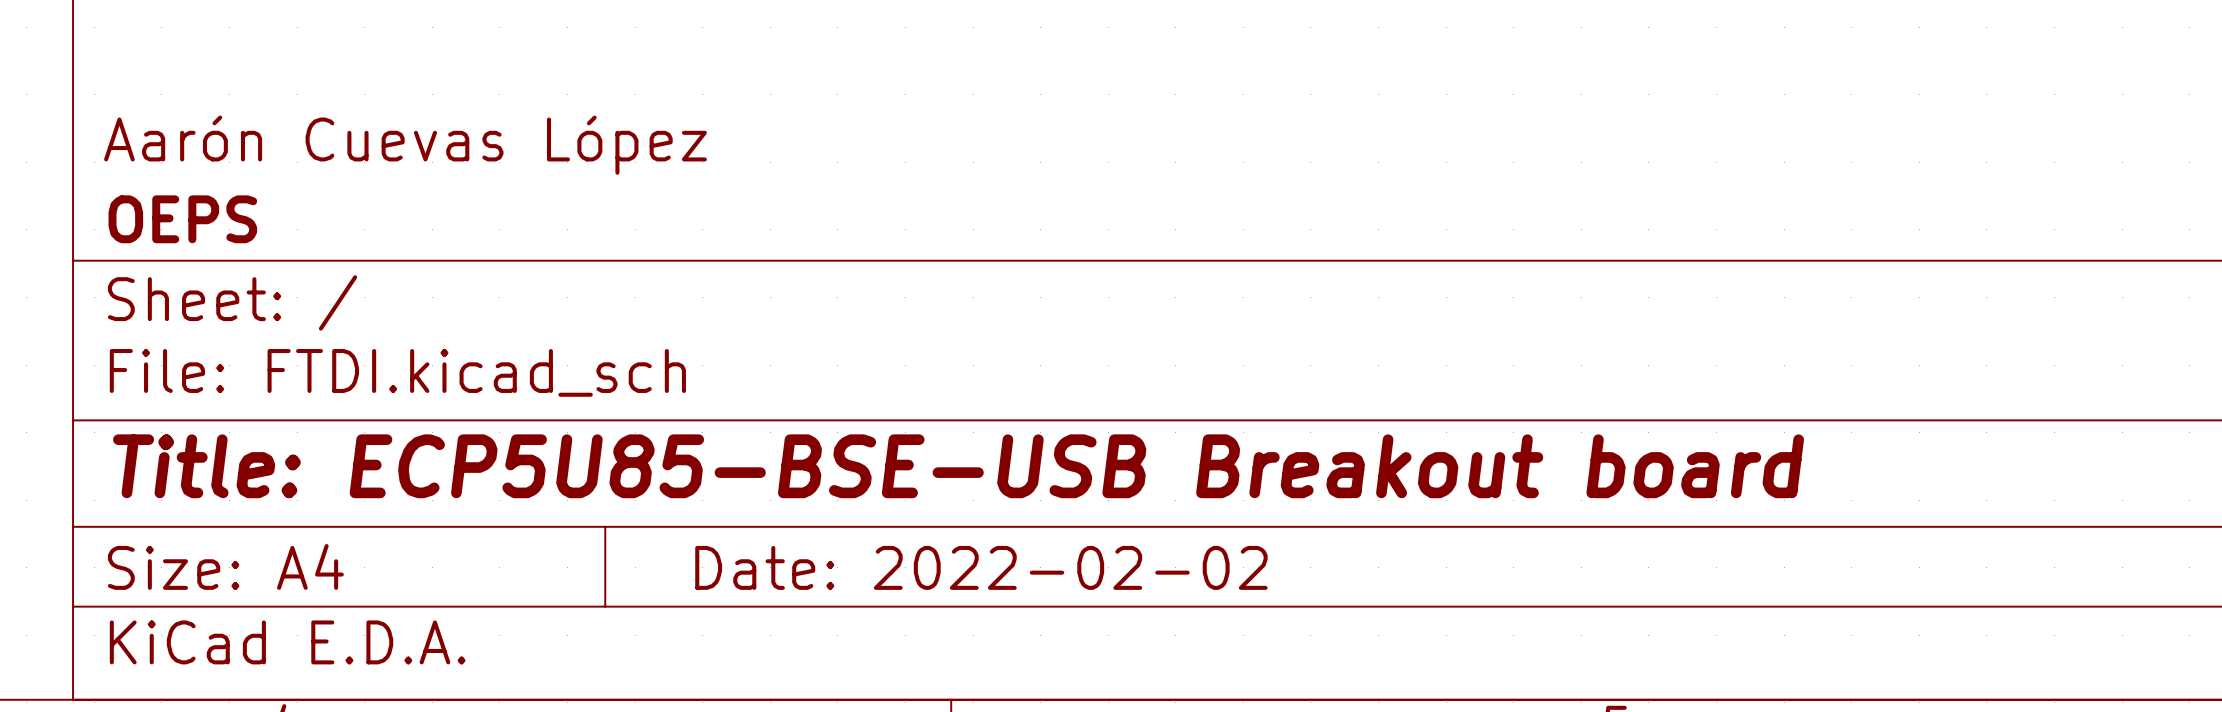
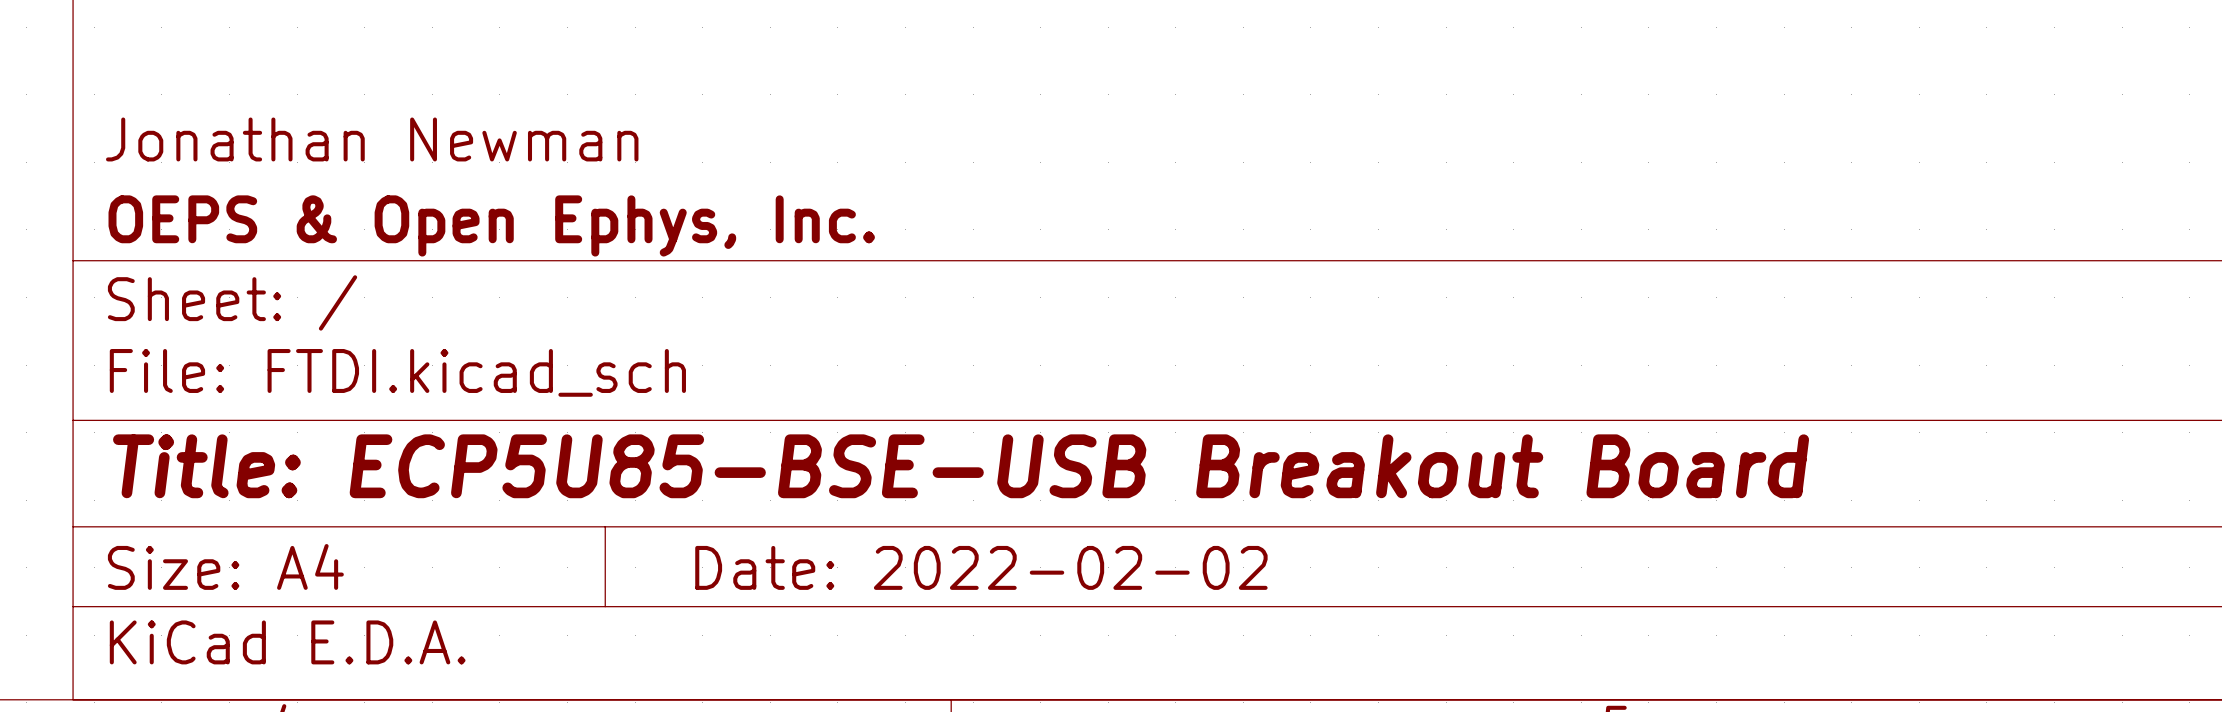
title block: Aarón Cuevas López (405, 145) -> Jonathan Newman (372, 139)
title block: OEPS (182, 219) -> OEPS & Open Ephys, Inc. (491, 225)
title block: Title: ECP5U85-BSE-USB Breakout board (958, 466) -> Title: ECP5U85-BSE-USB Breakout Board (961, 466)

